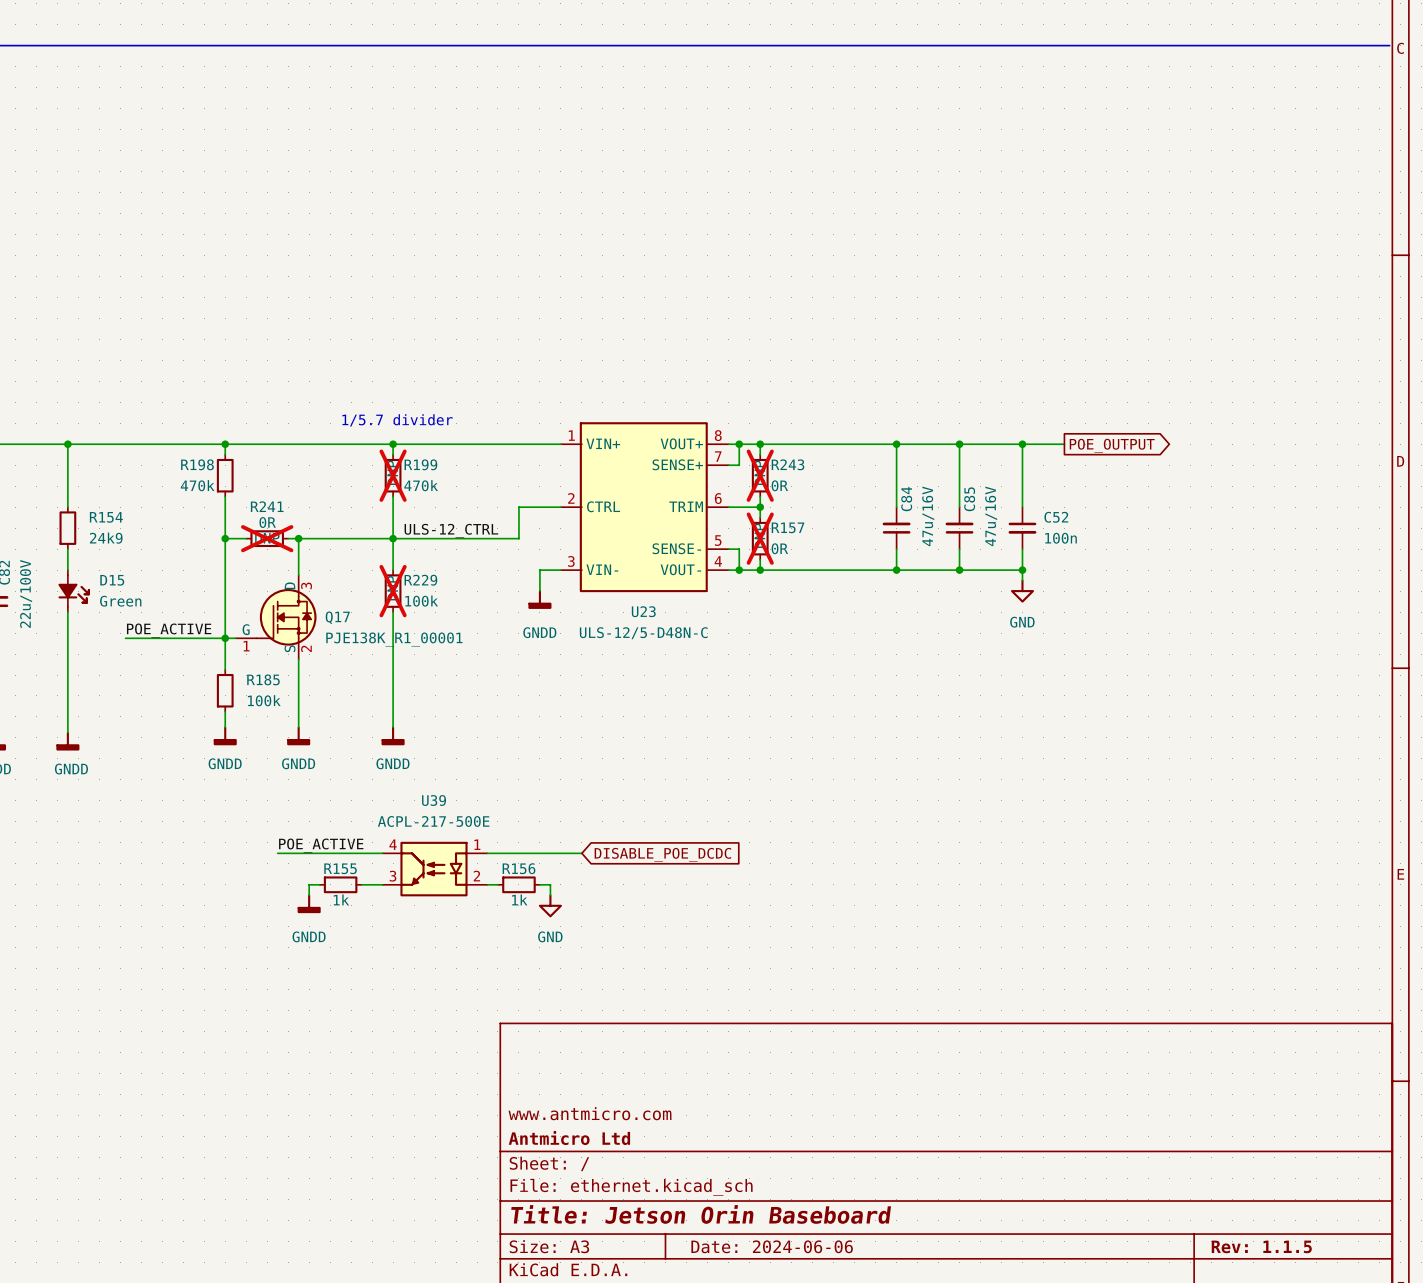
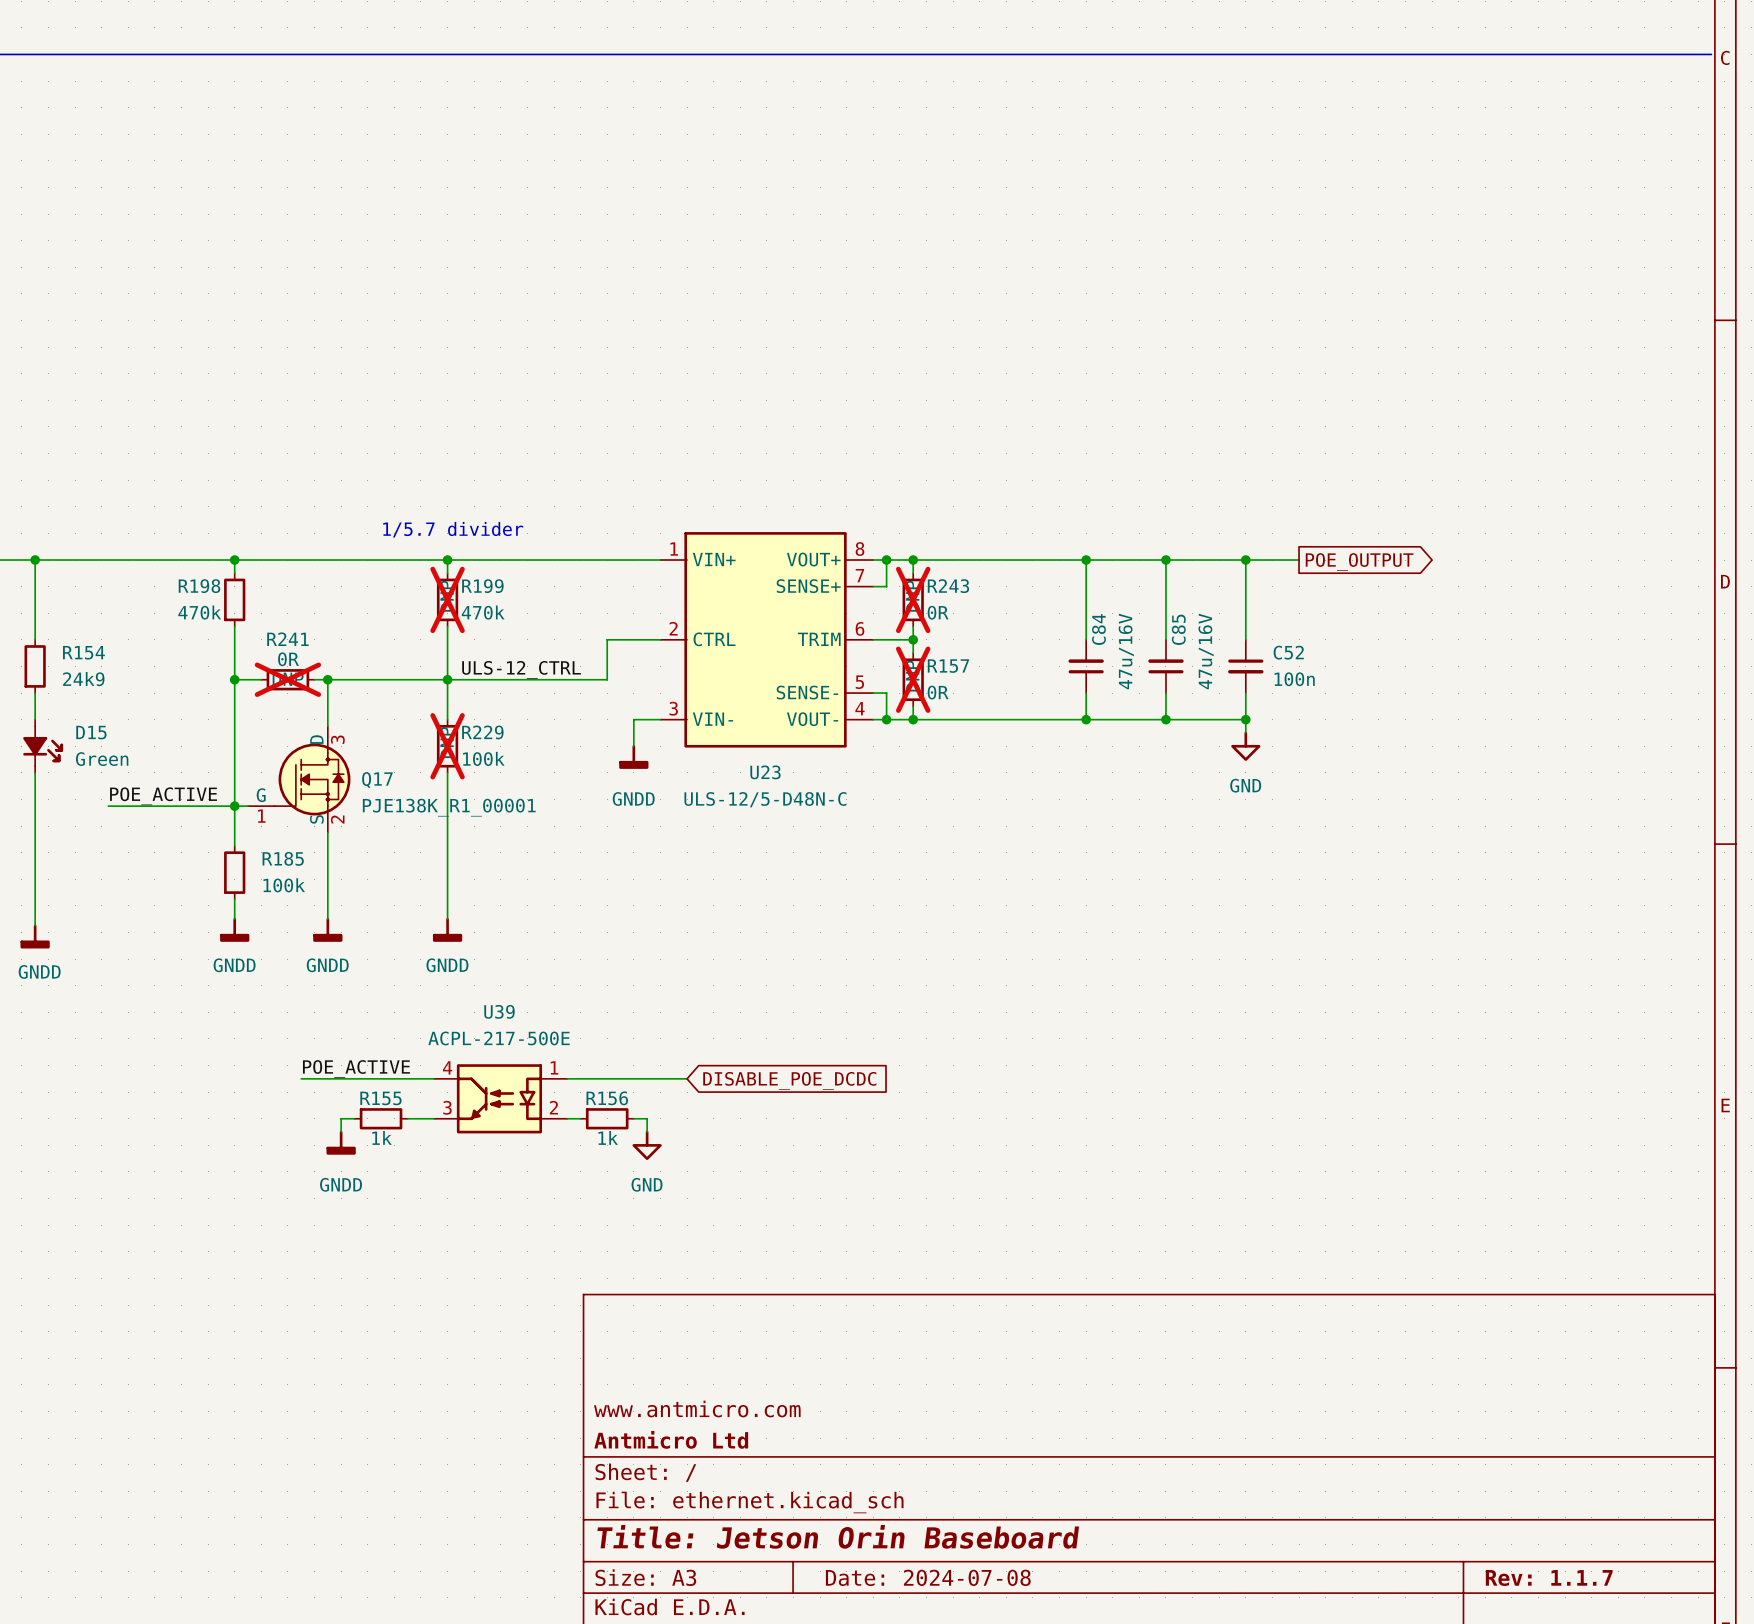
title block: Date: 2024-06-06 (772, 1246) -> Date: 2024-07-08 (928, 1577)
title block: Rev: 1.1.5 (1261, 1246) -> Rev: 1.1.7 (1549, 1578)

